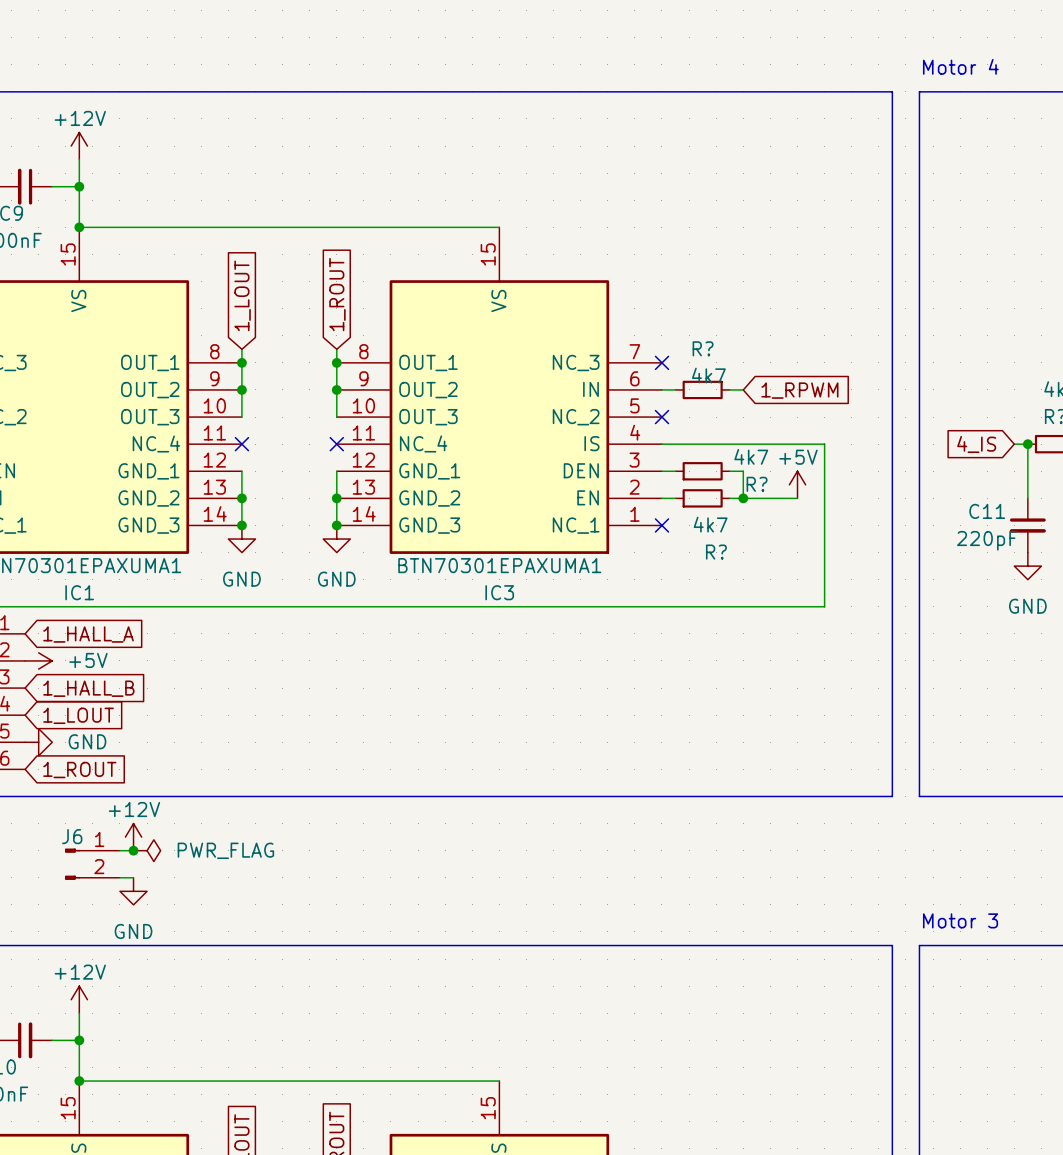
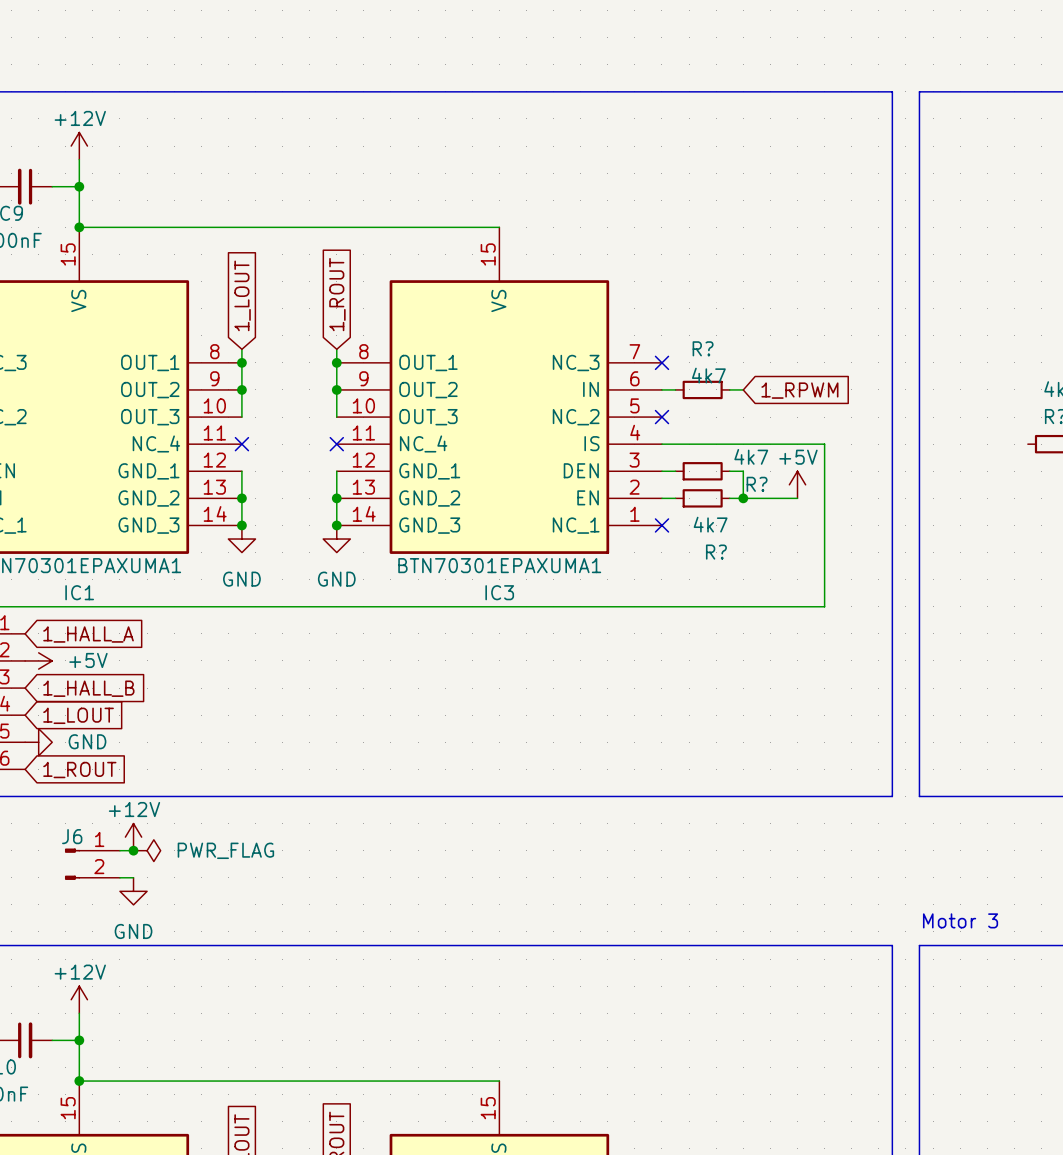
text: Motor 4 (960, 66) -> none
global label: 4_IS (976, 444) -> none
wire: (1014, 444) (1027, 444) (1027, 498) -> none
junction: (1027, 444) -> none
C11: 220pF (1027, 525) -> none
power symbol: GND (1027, 566) -> none

